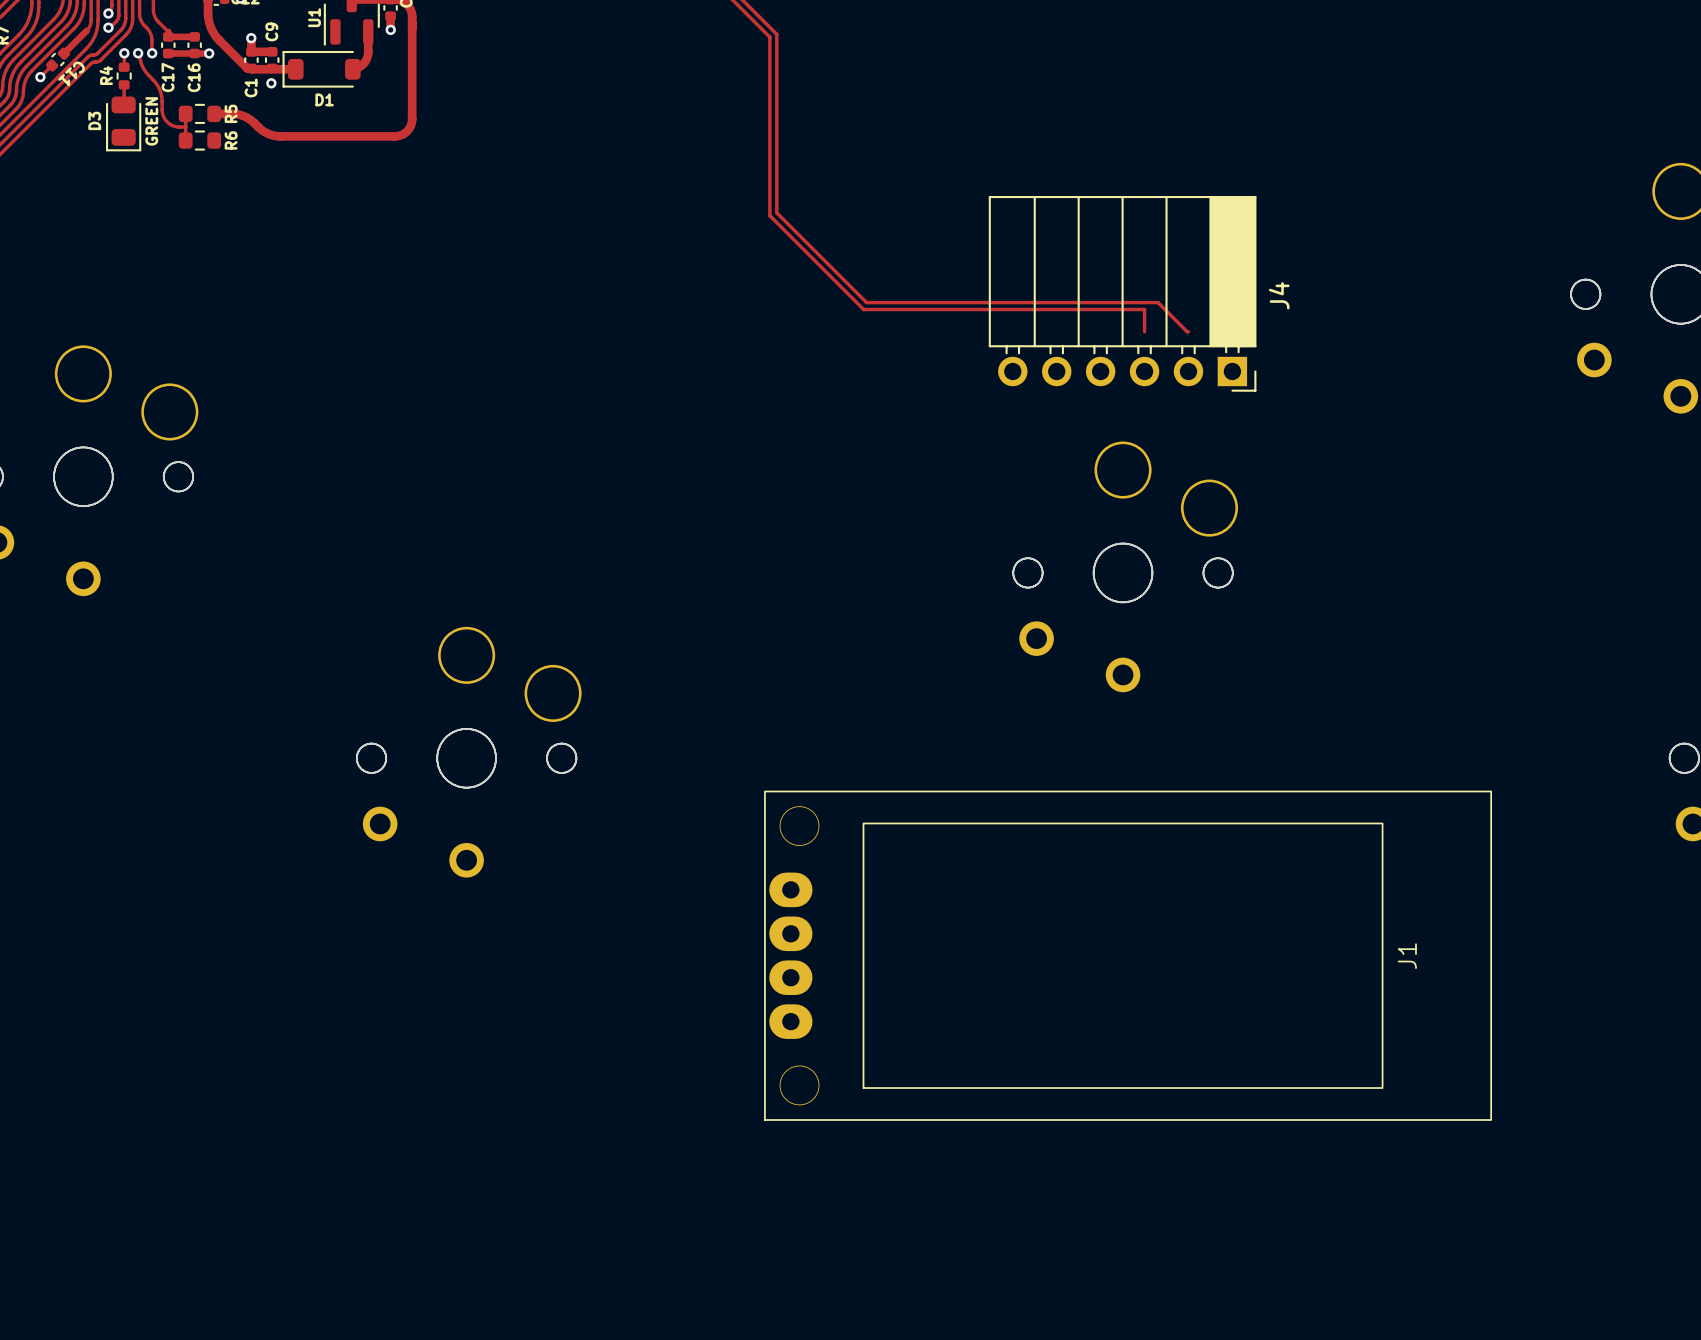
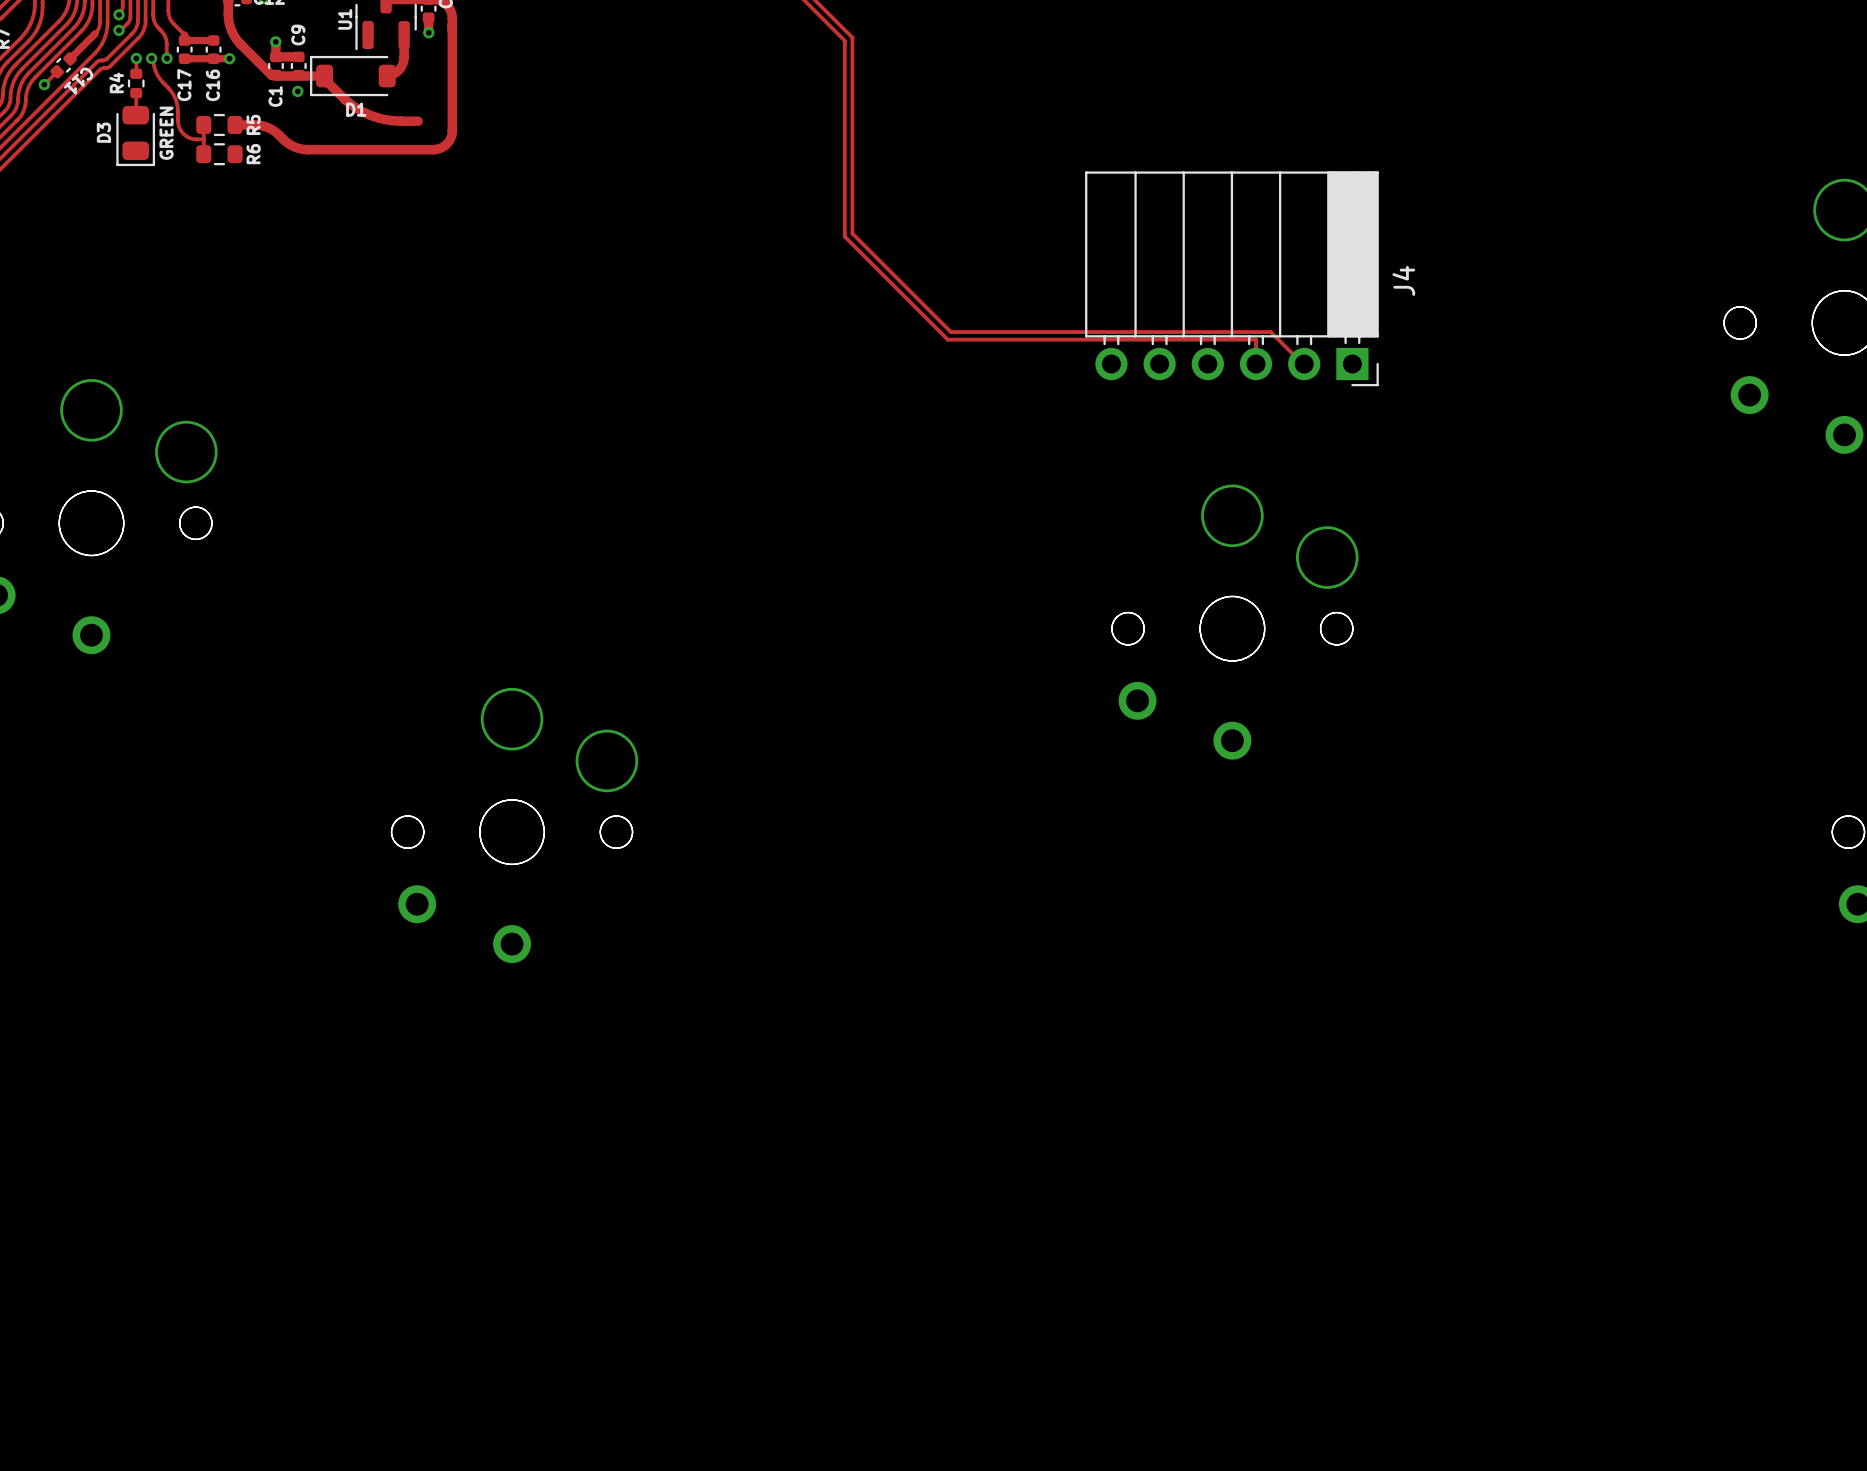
track: none -> (324, 79) (353, 106) (371, 115) (390, 120) (418, 121)
J4 position: (1122, 293) -> (1231, 278)
J1: (1128, 955) -> none

